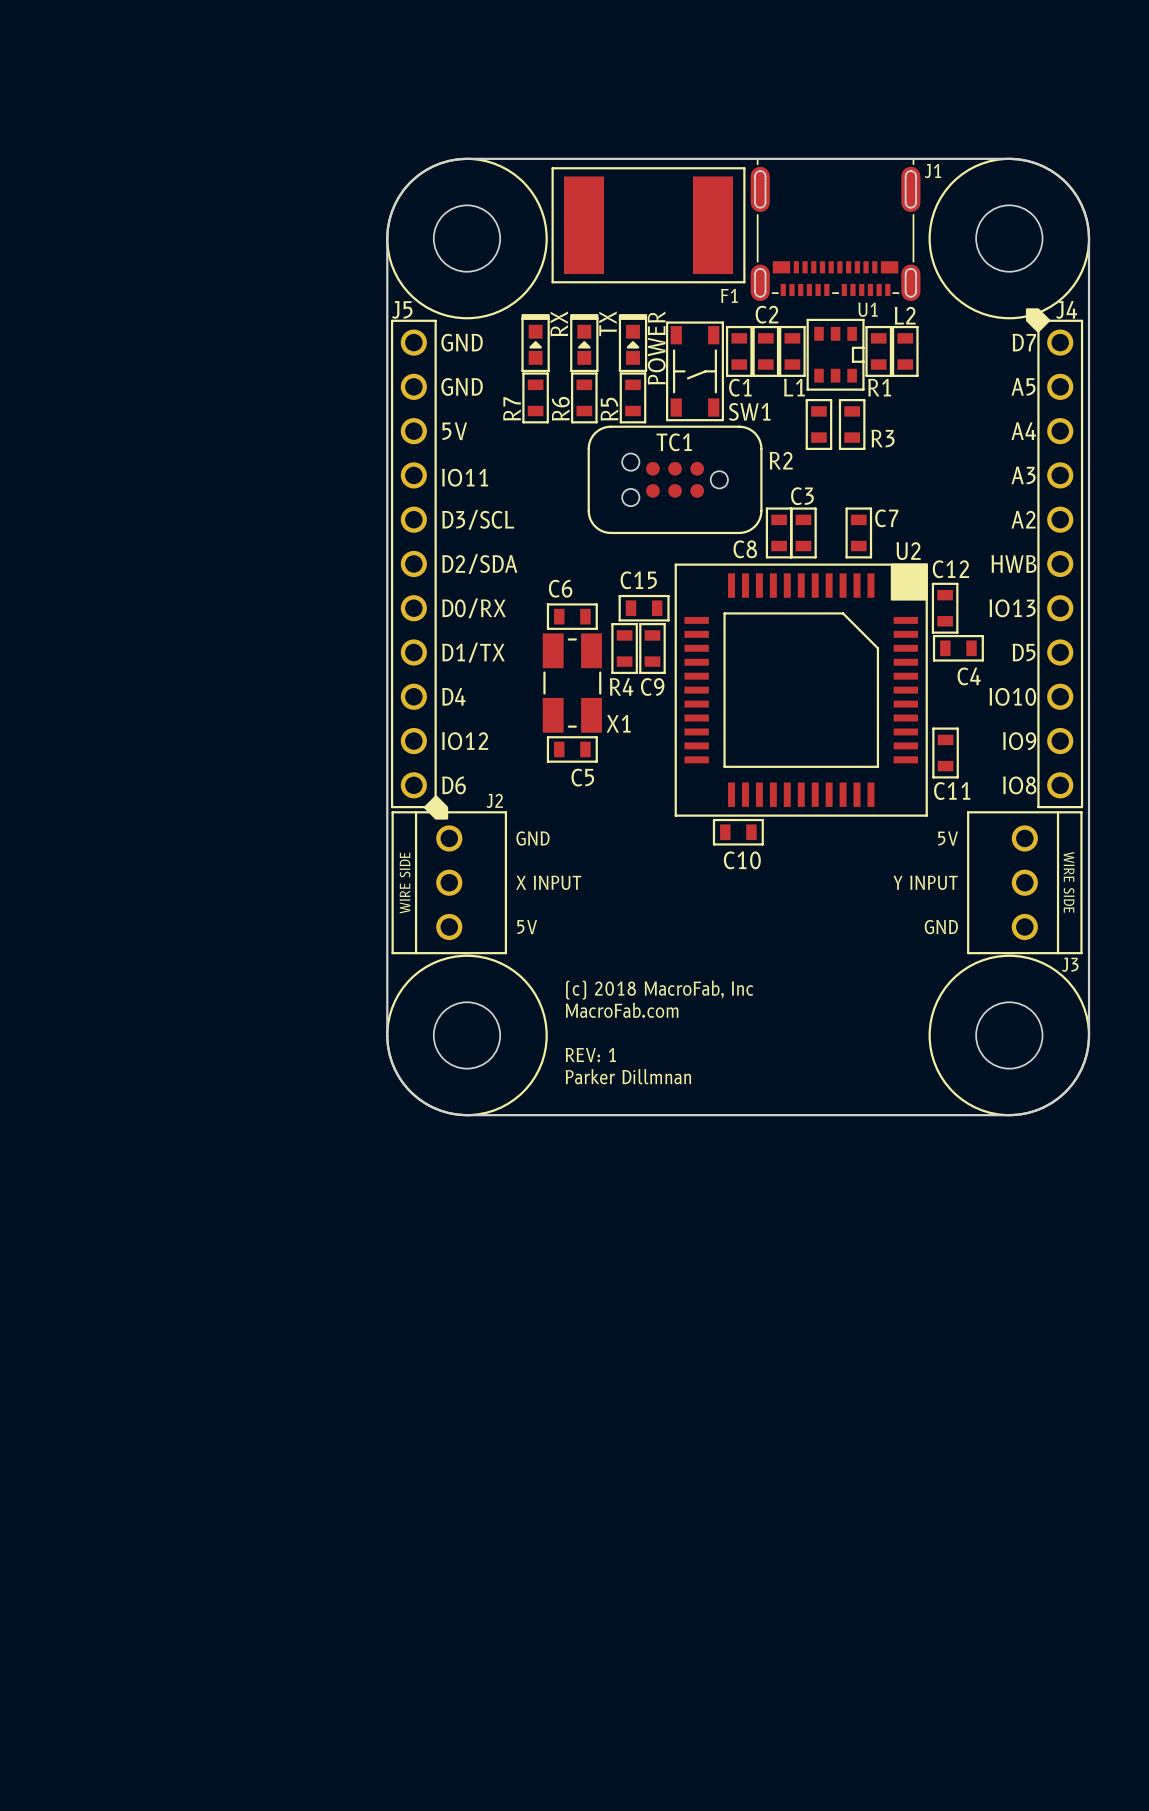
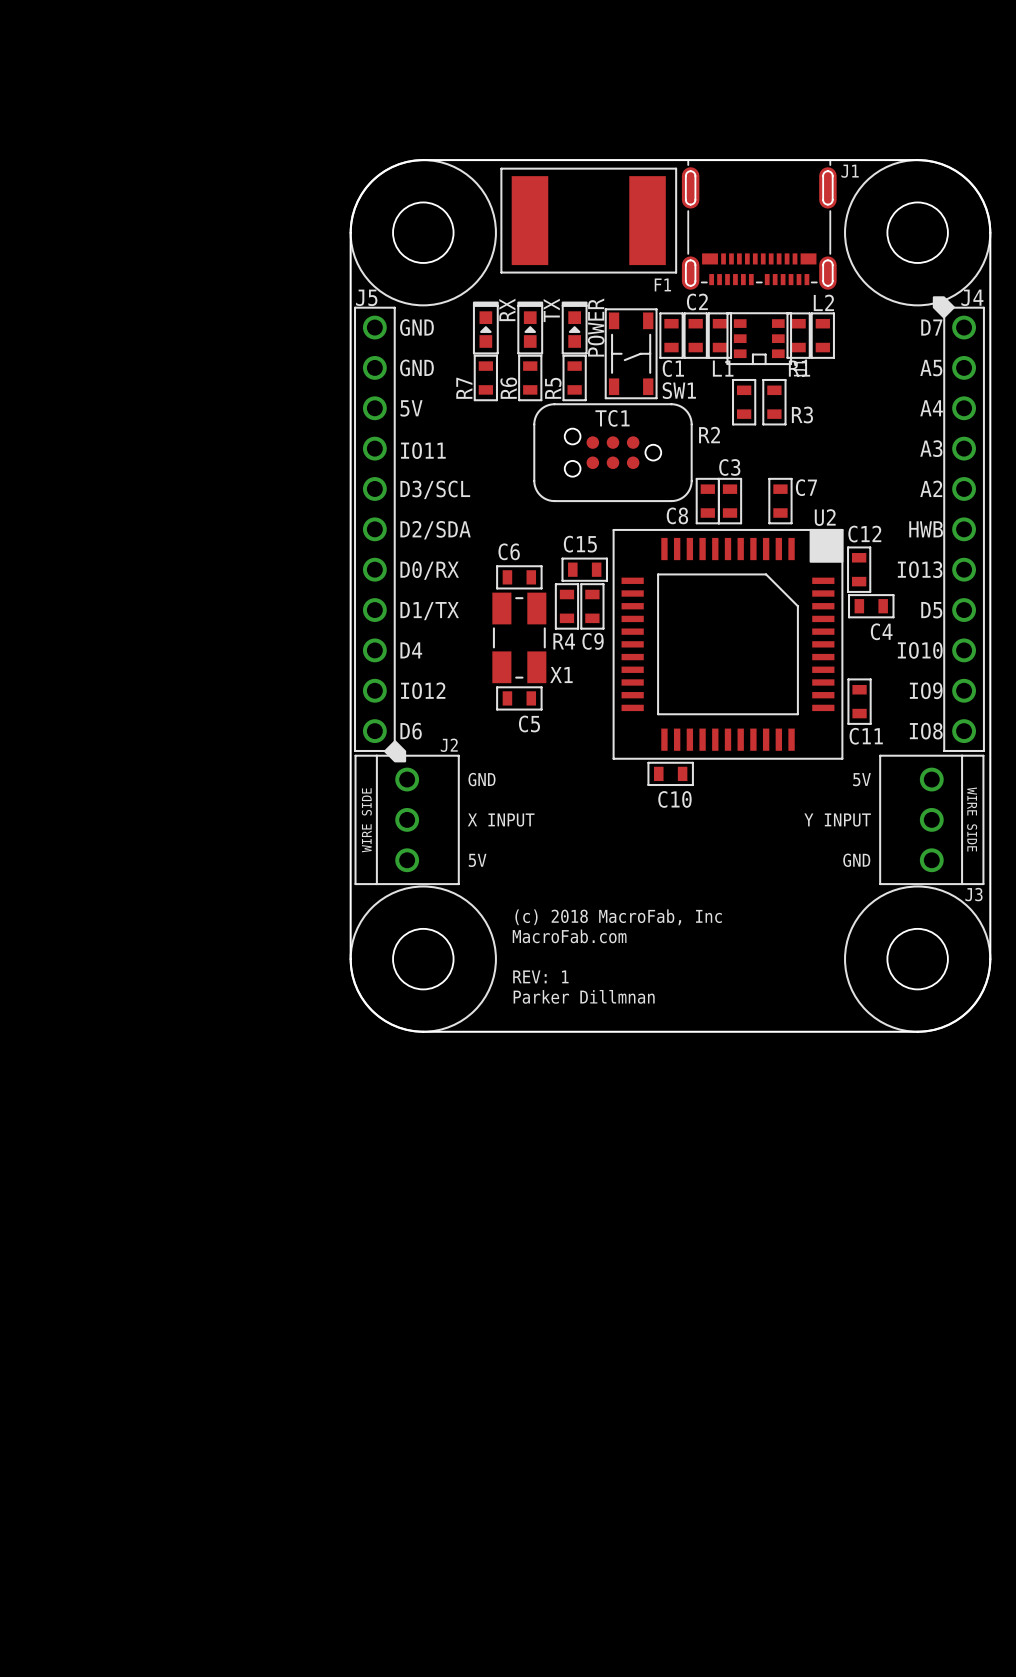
U1 rotation: 0° (835, 354) -> 90° clockwise (759, 338)

